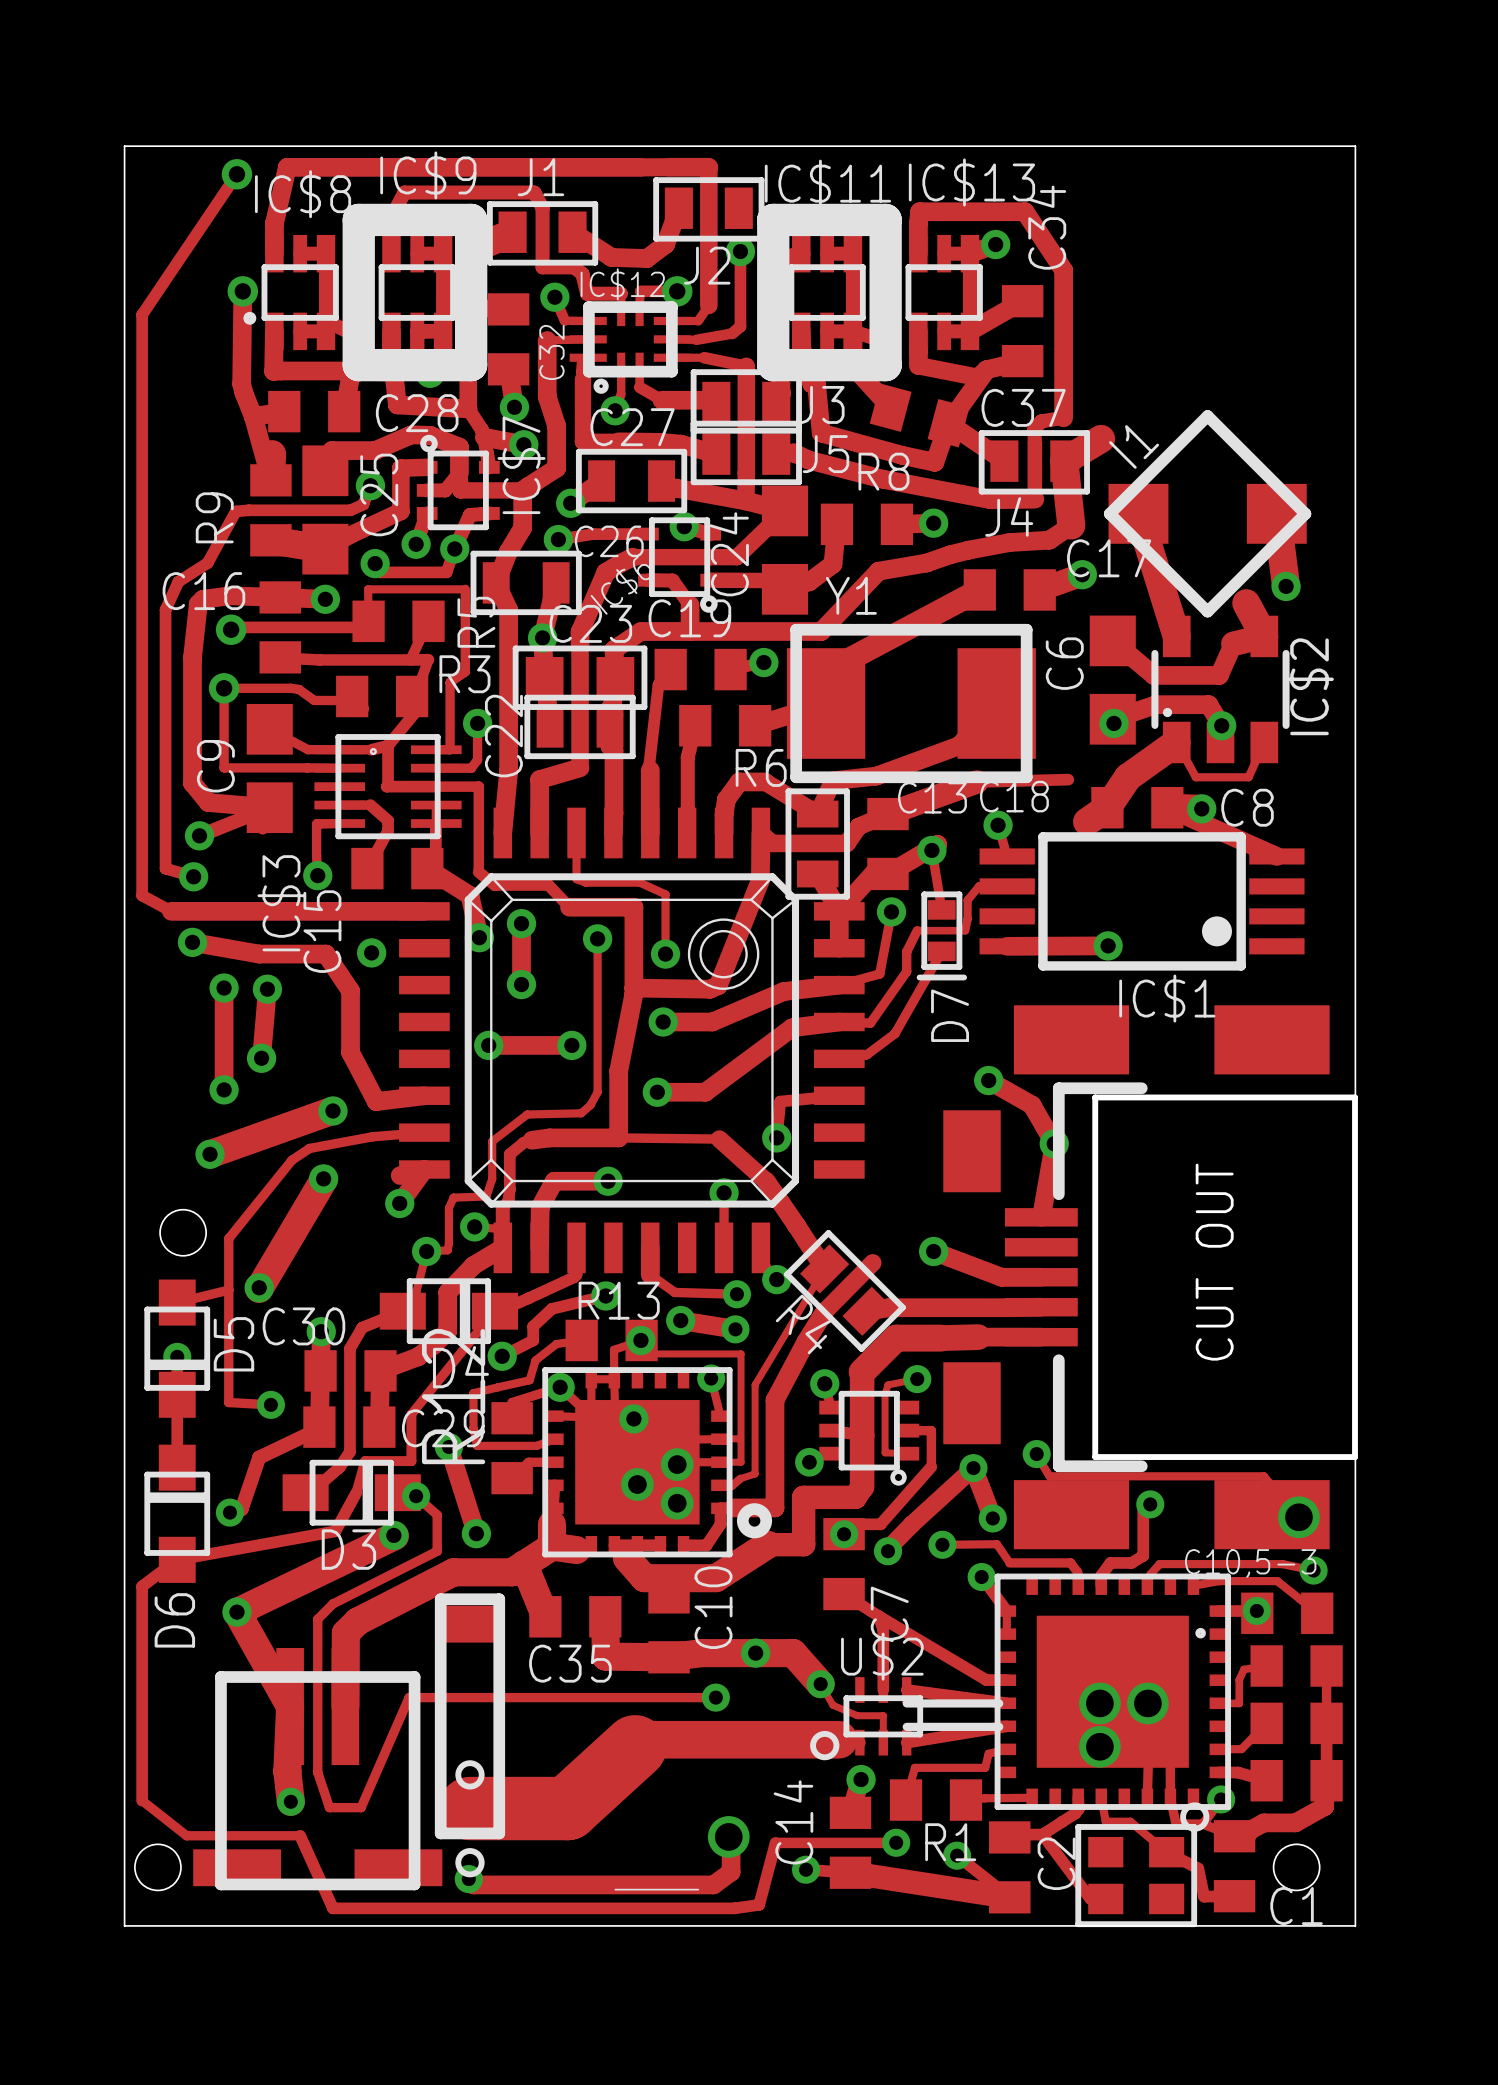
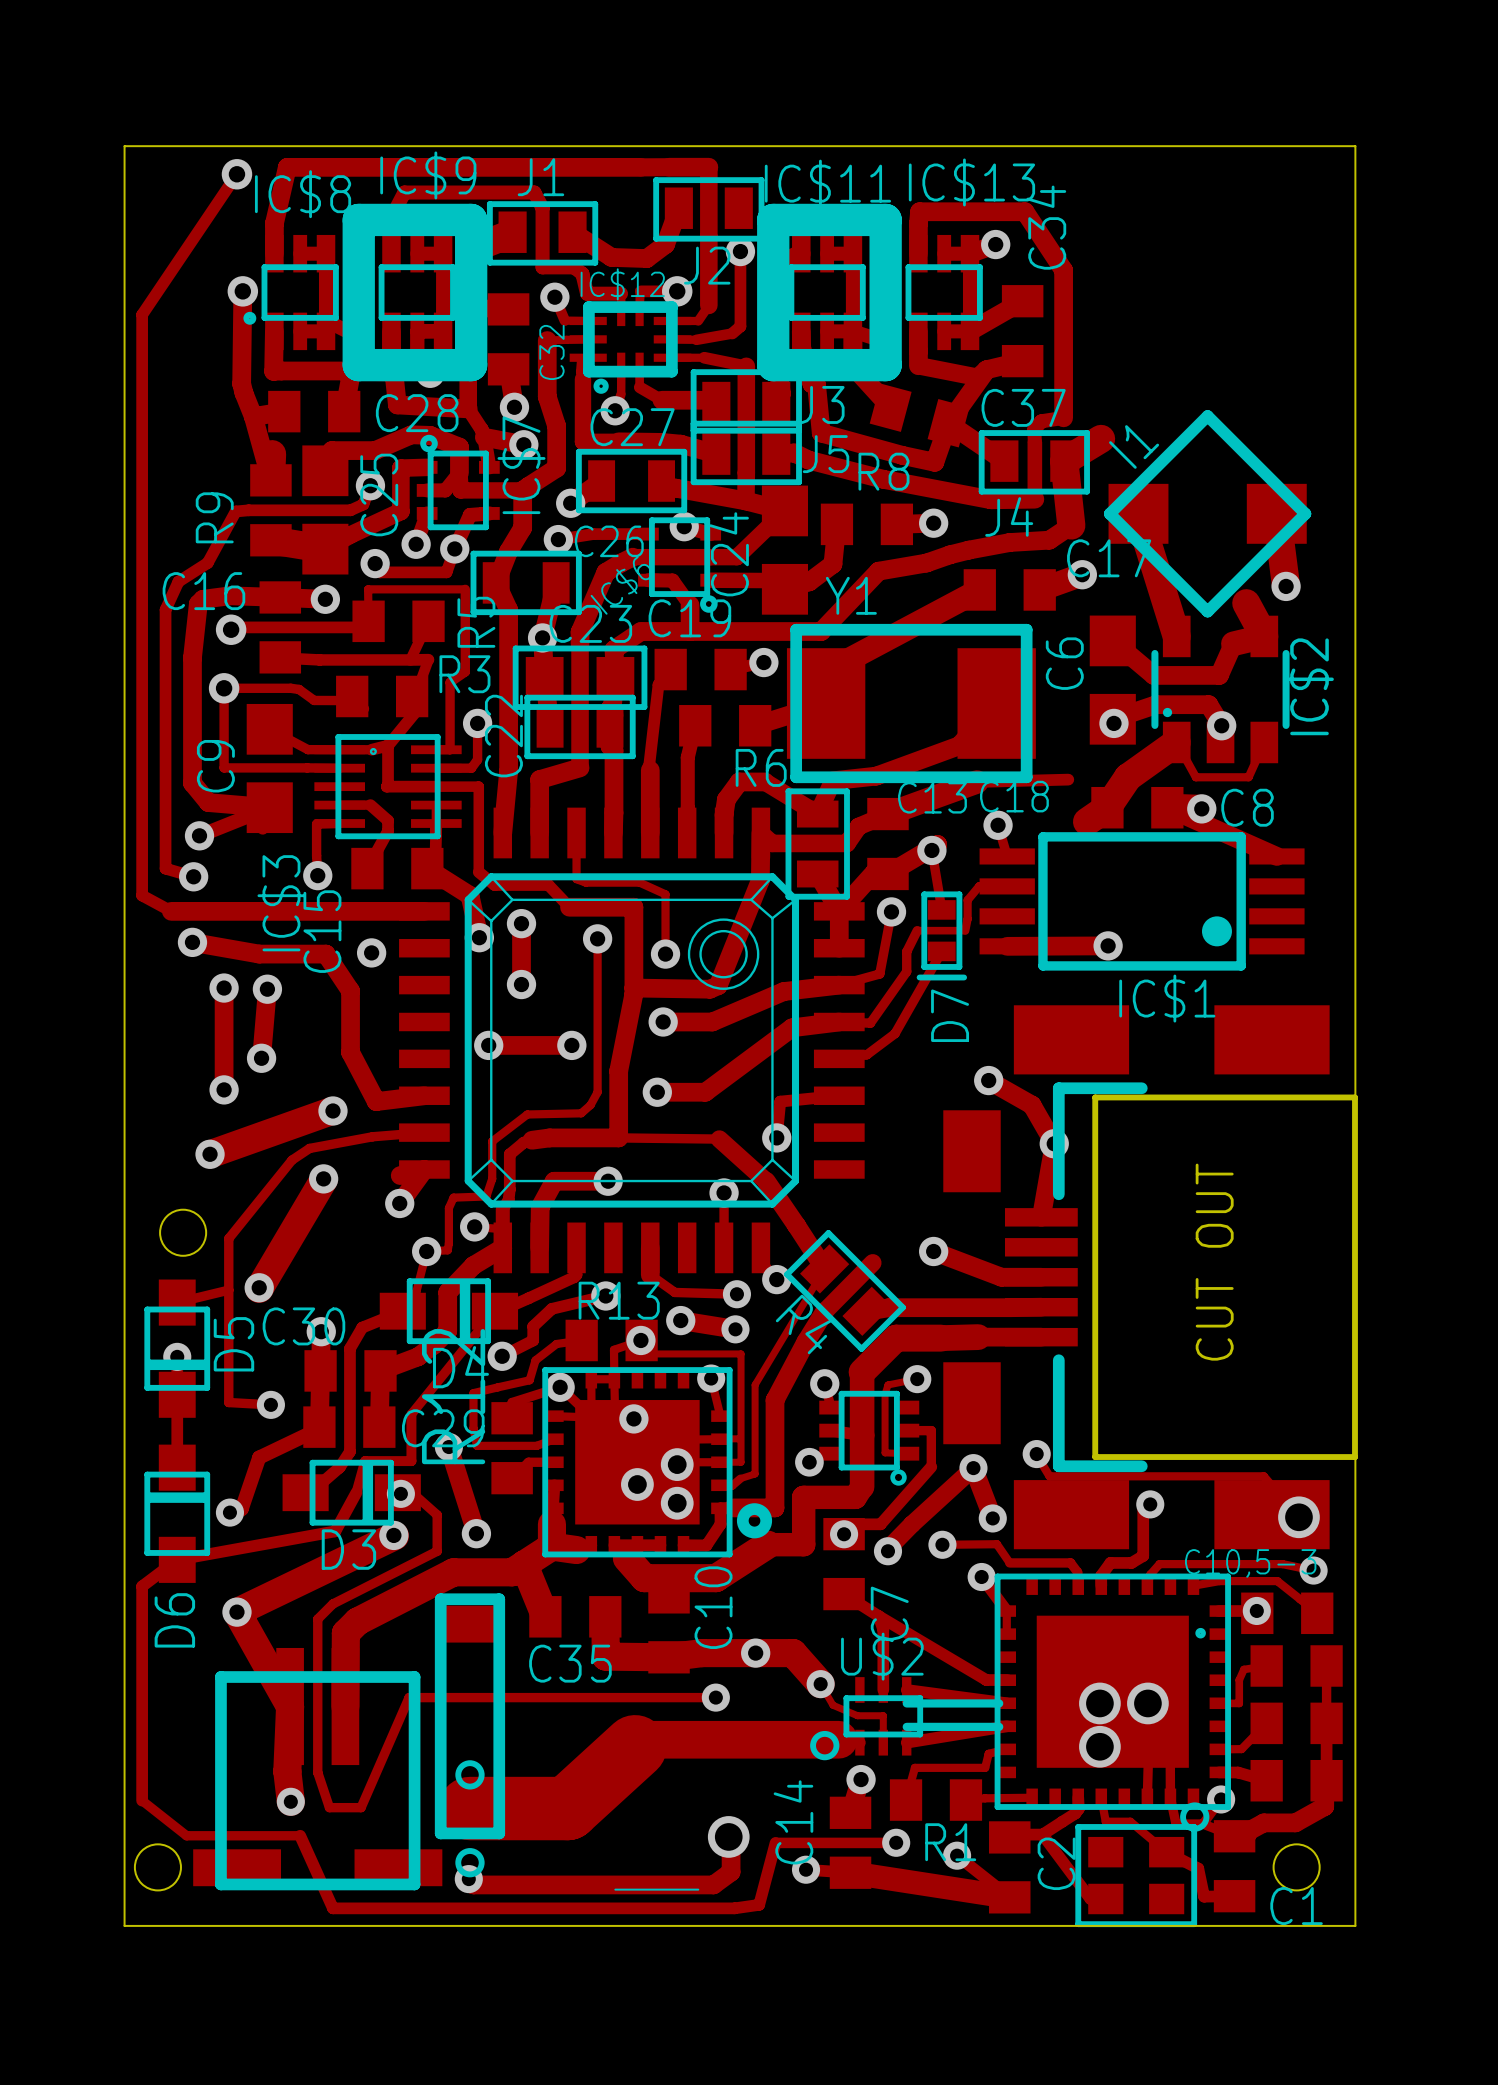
via position: (416, 1496) -> (400, 1493)

